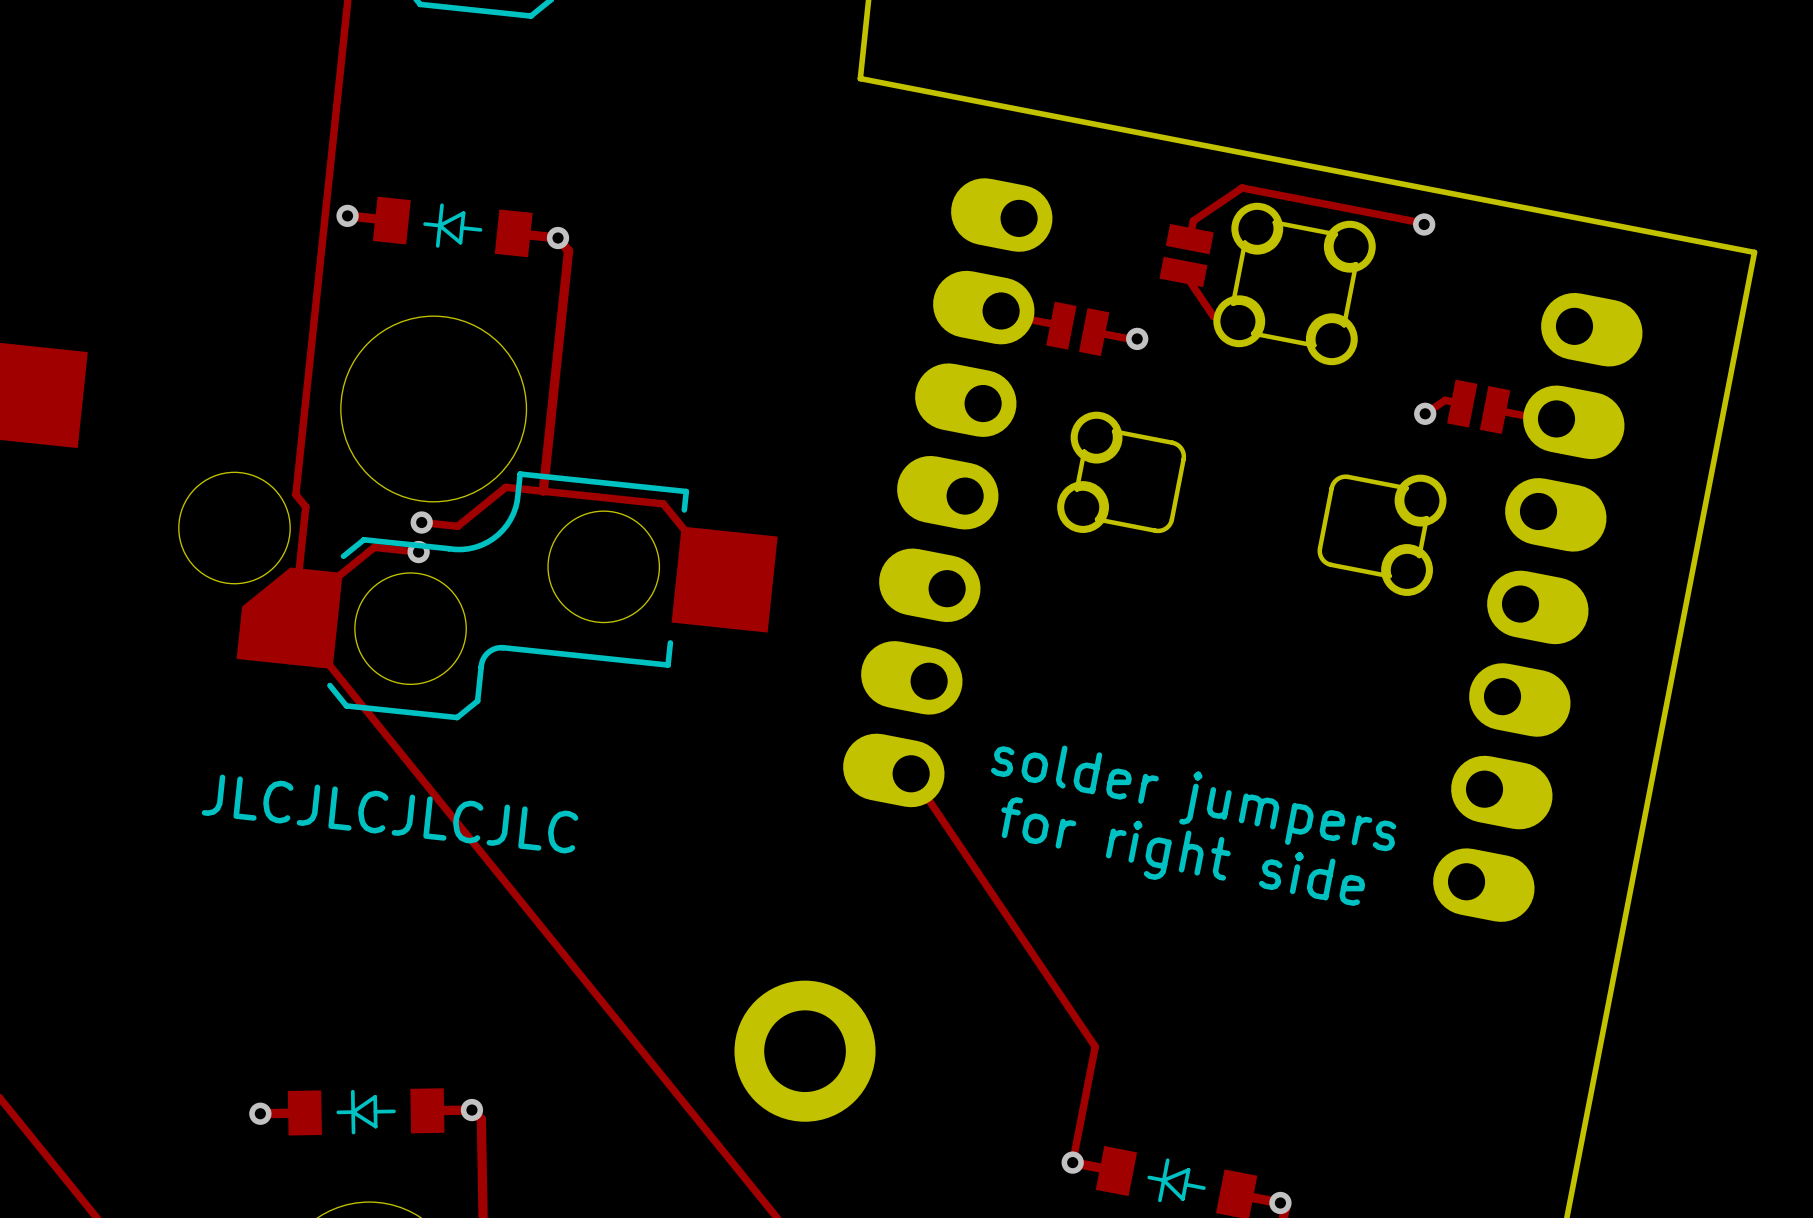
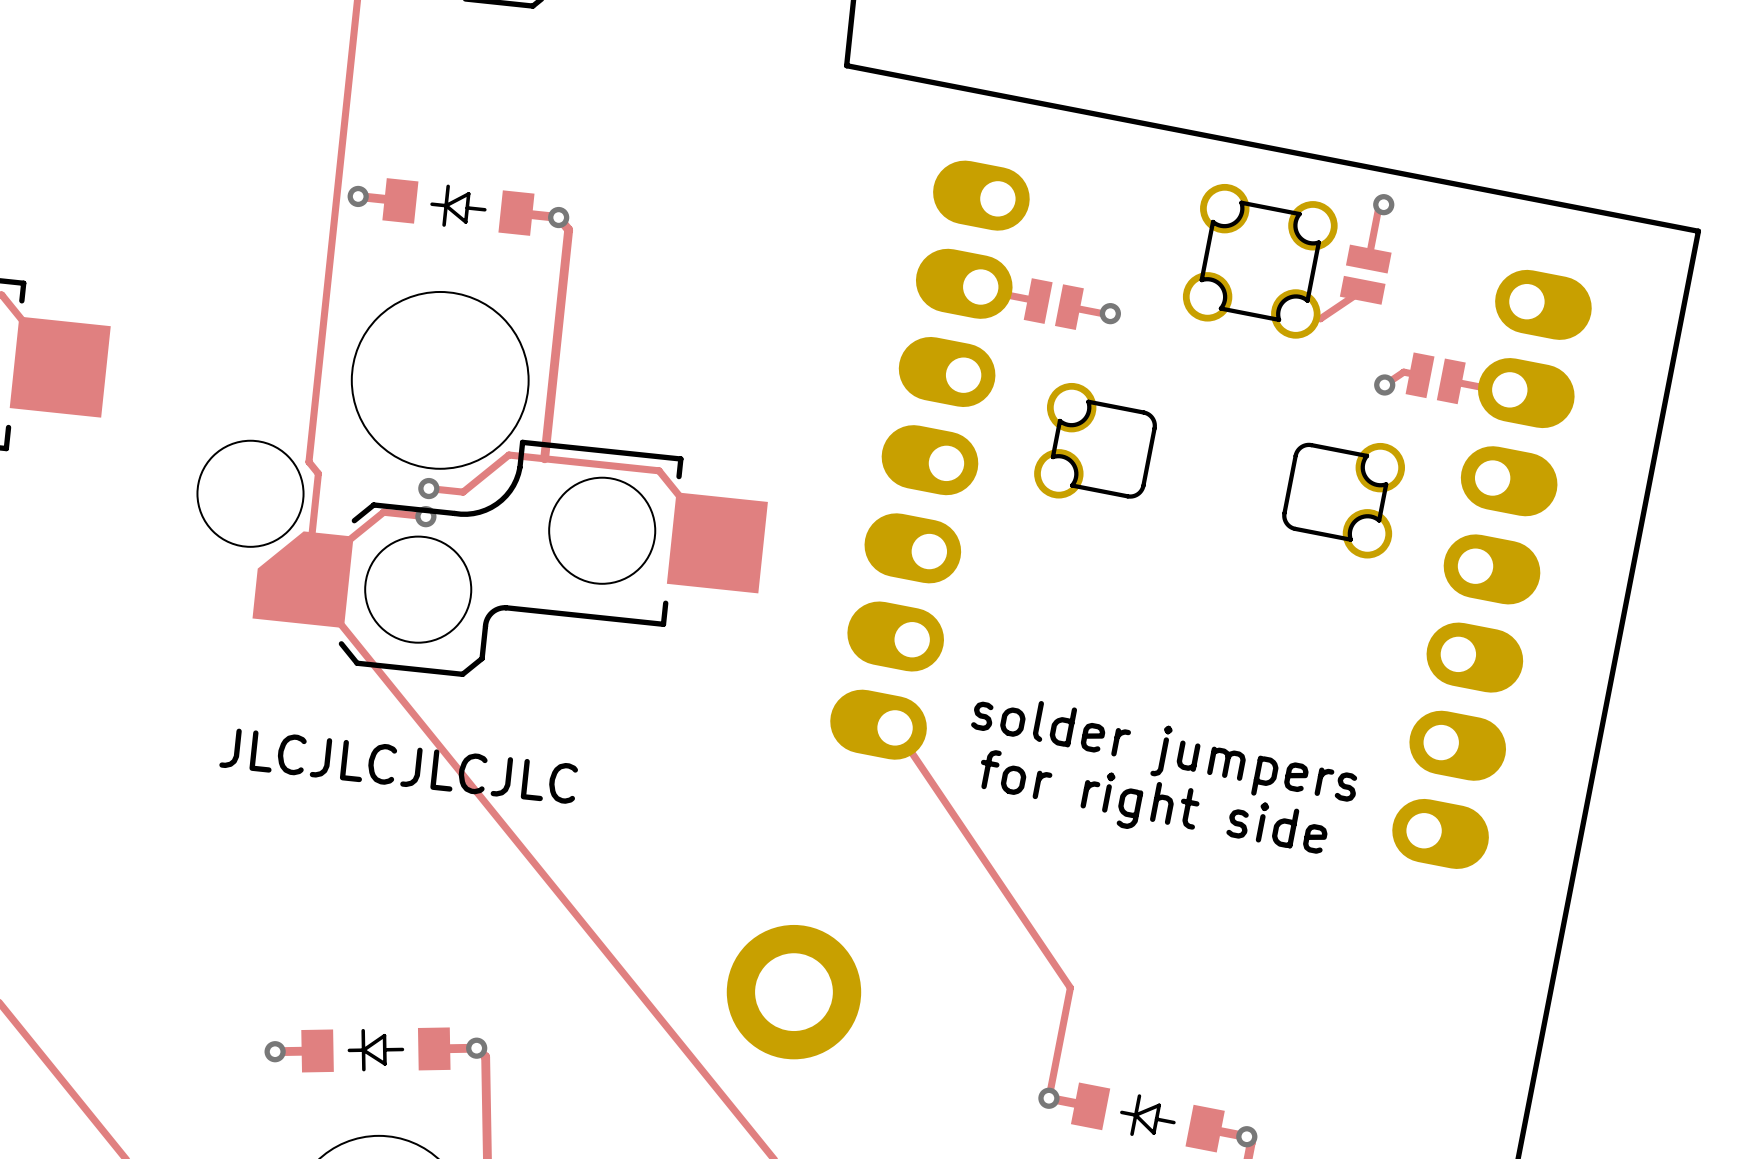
track: none -> (1382, 203) (1378, 208) (1368, 259)
track: (1424, 224) (1242, 187) (1193, 220) (1189, 239) -> none
part position: (1186, 255) -> (1365, 274)
track: (1183, 271) (1213, 316) (1239, 321) -> none
track: none -> (1362, 290) (1320, 318) (1295, 313)

